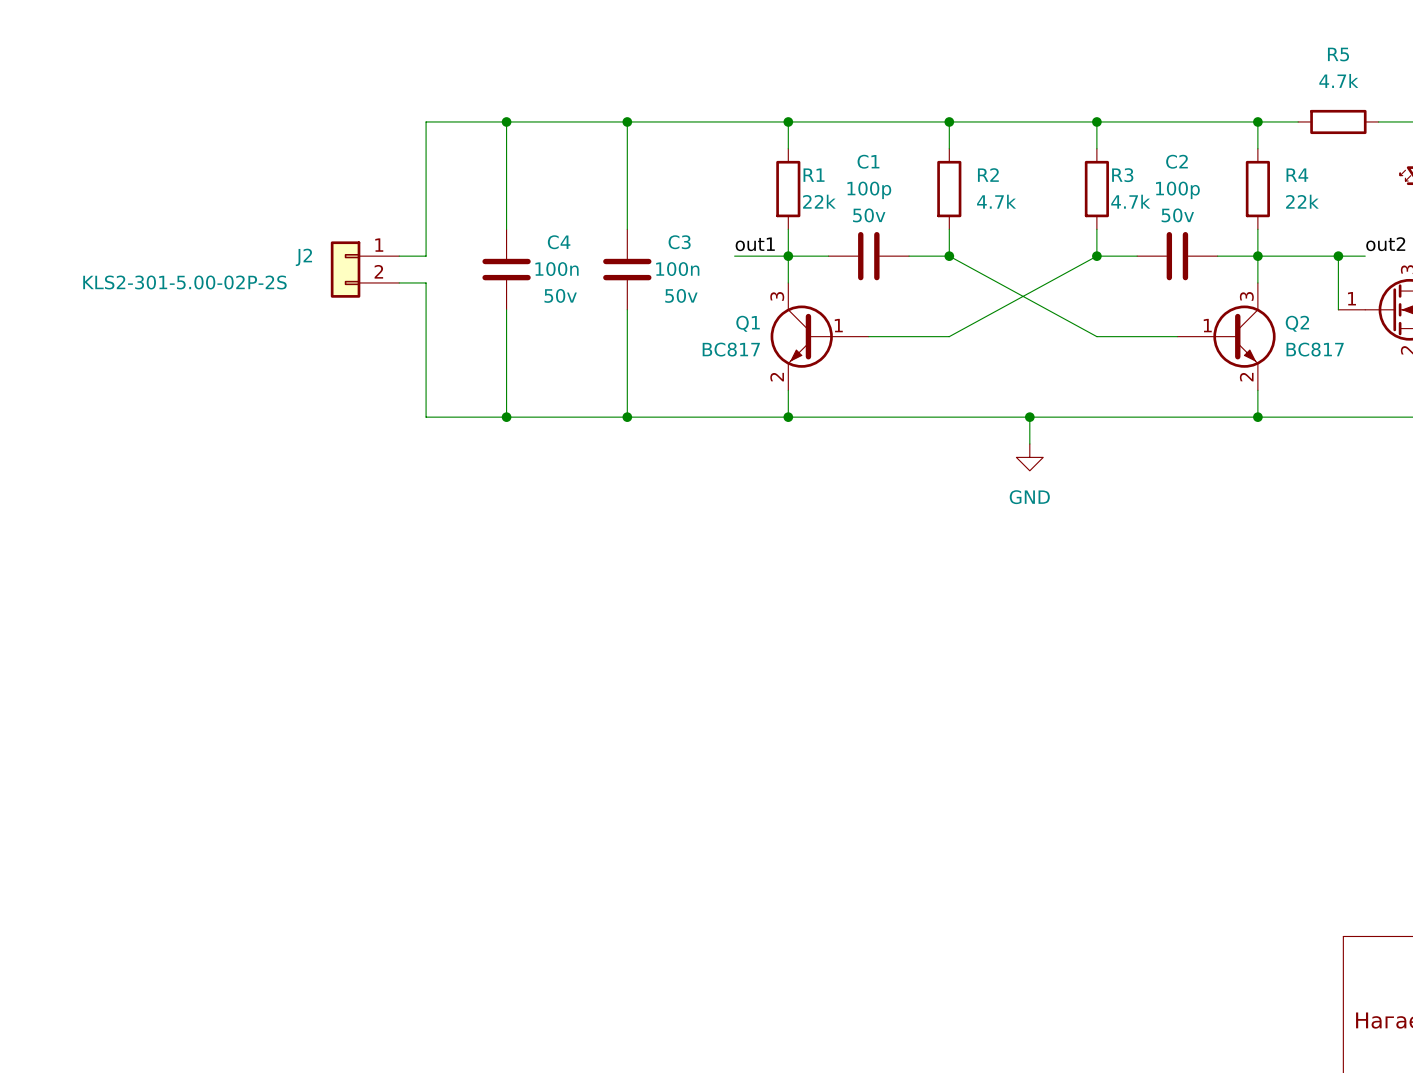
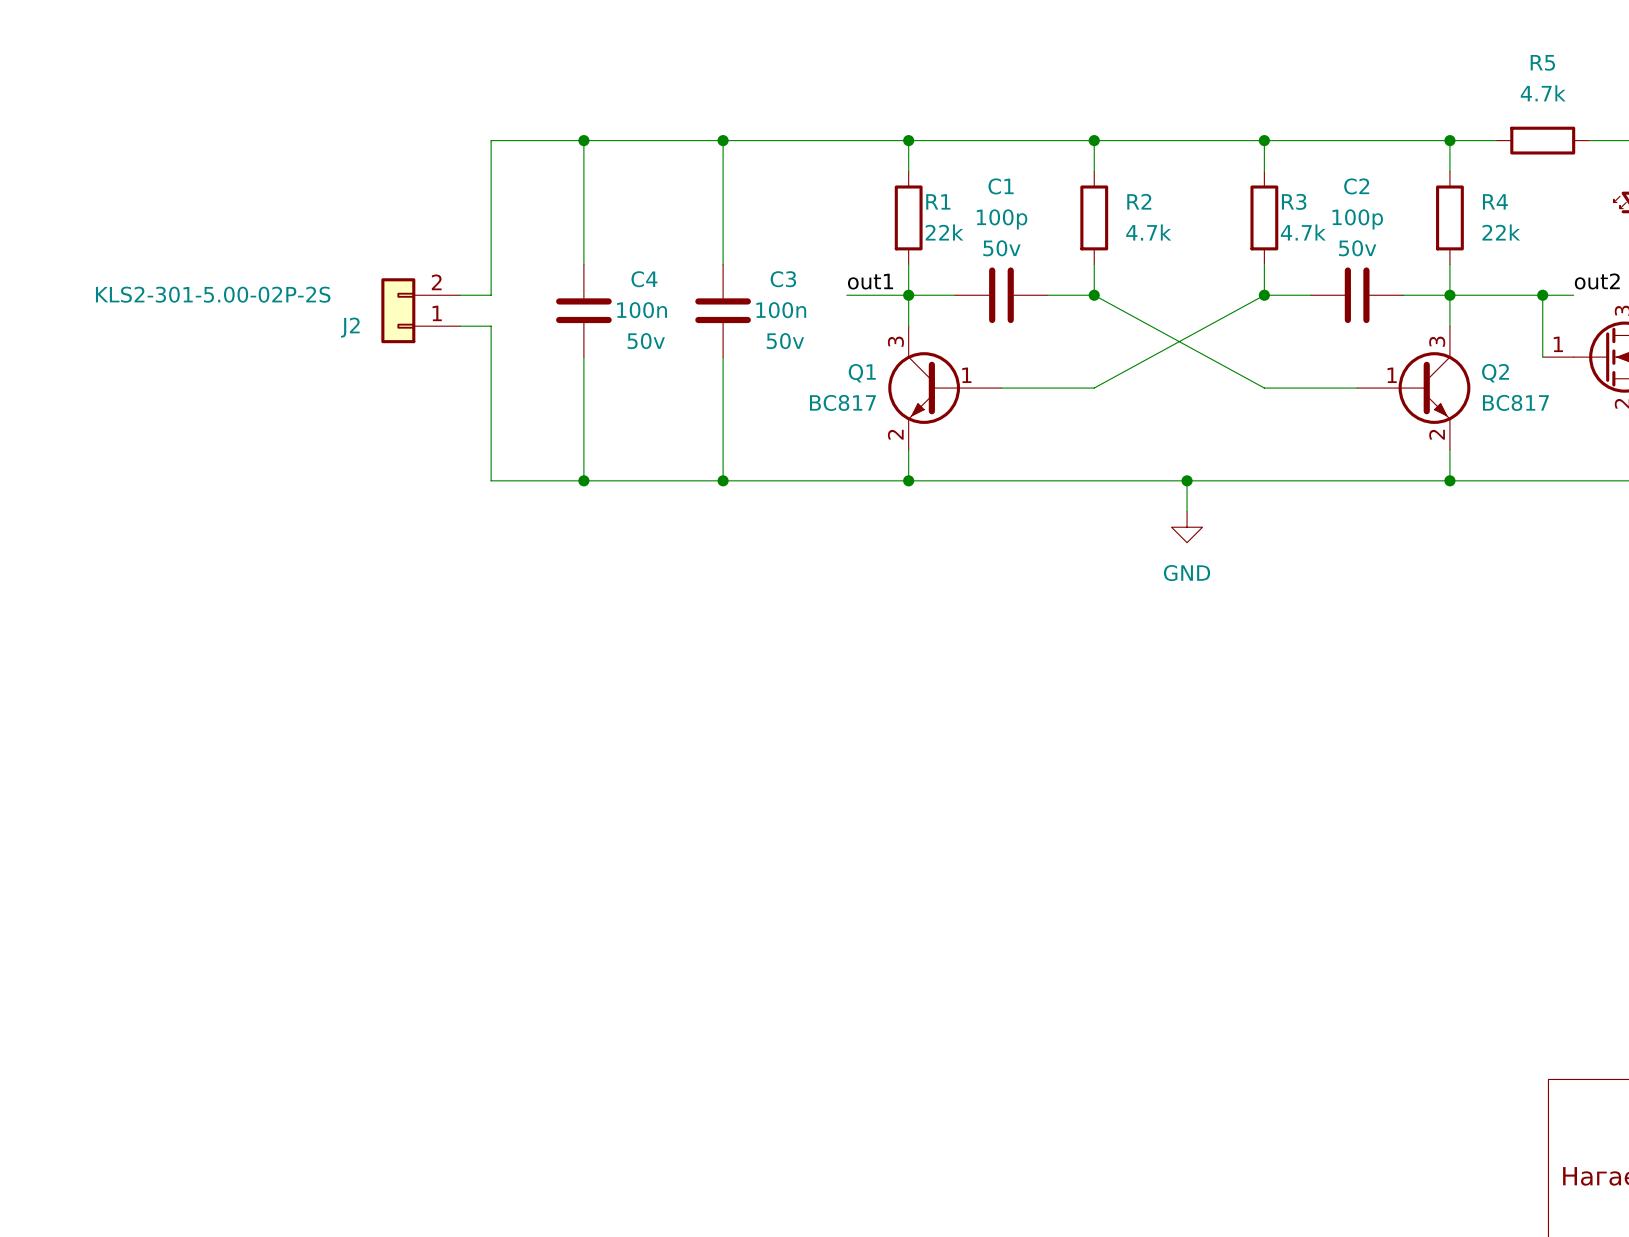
J2 flip: as is (345, 269) -> up-down (398, 310)

